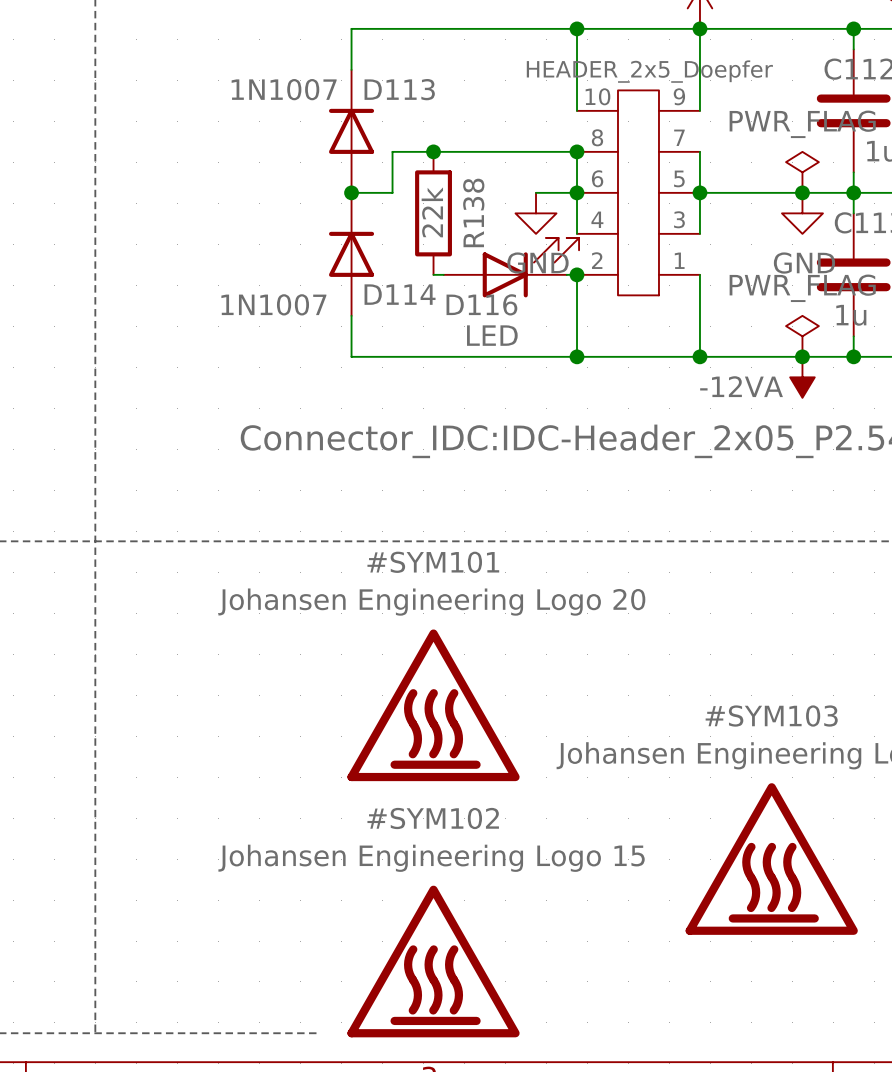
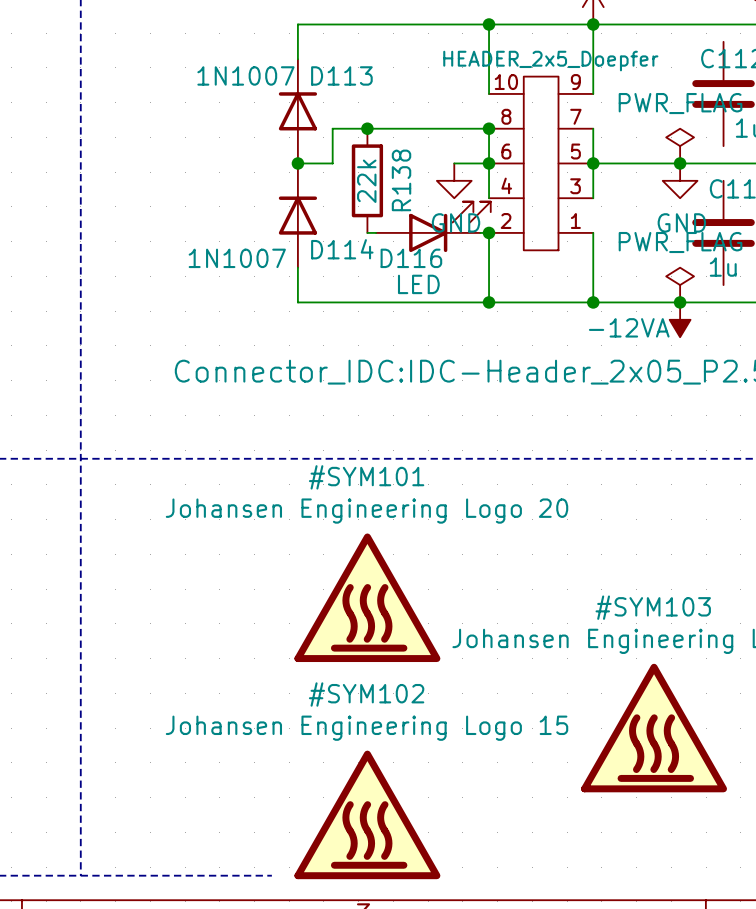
wire: (853, 28) (853, 49) -> none
junction: (853, 28) -> none
wire: (853, 172) (853, 213) -> none
junction: (853, 192) -> none
wire: (853, 336) (853, 356) -> none
junction: (853, 356) -> none

